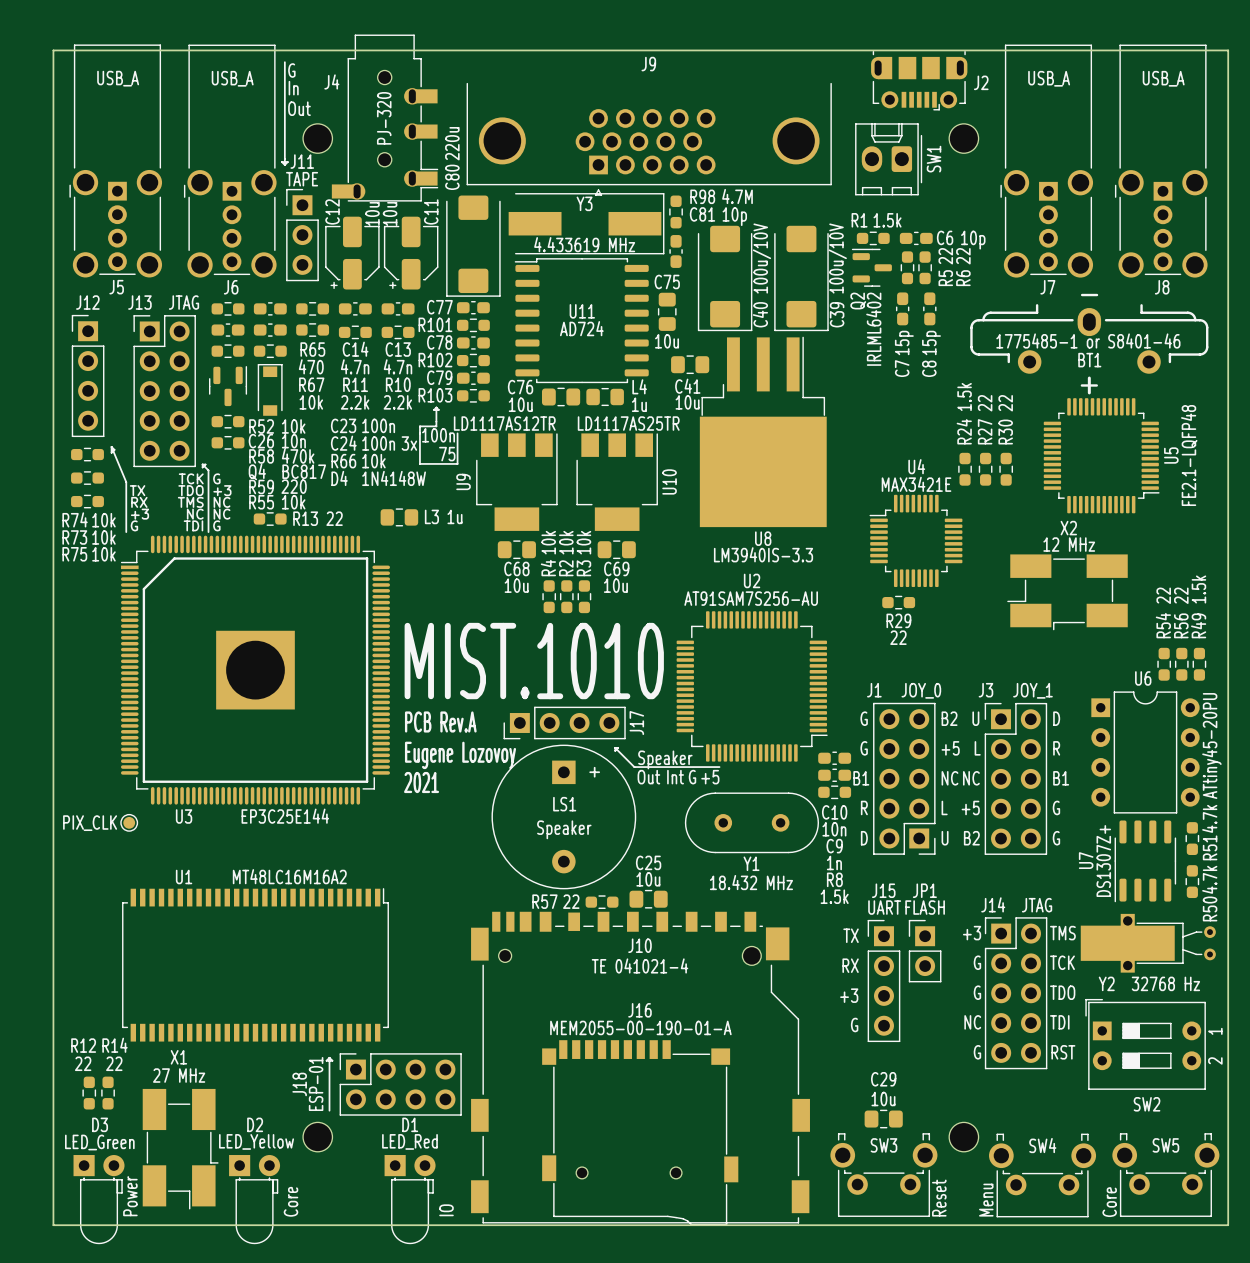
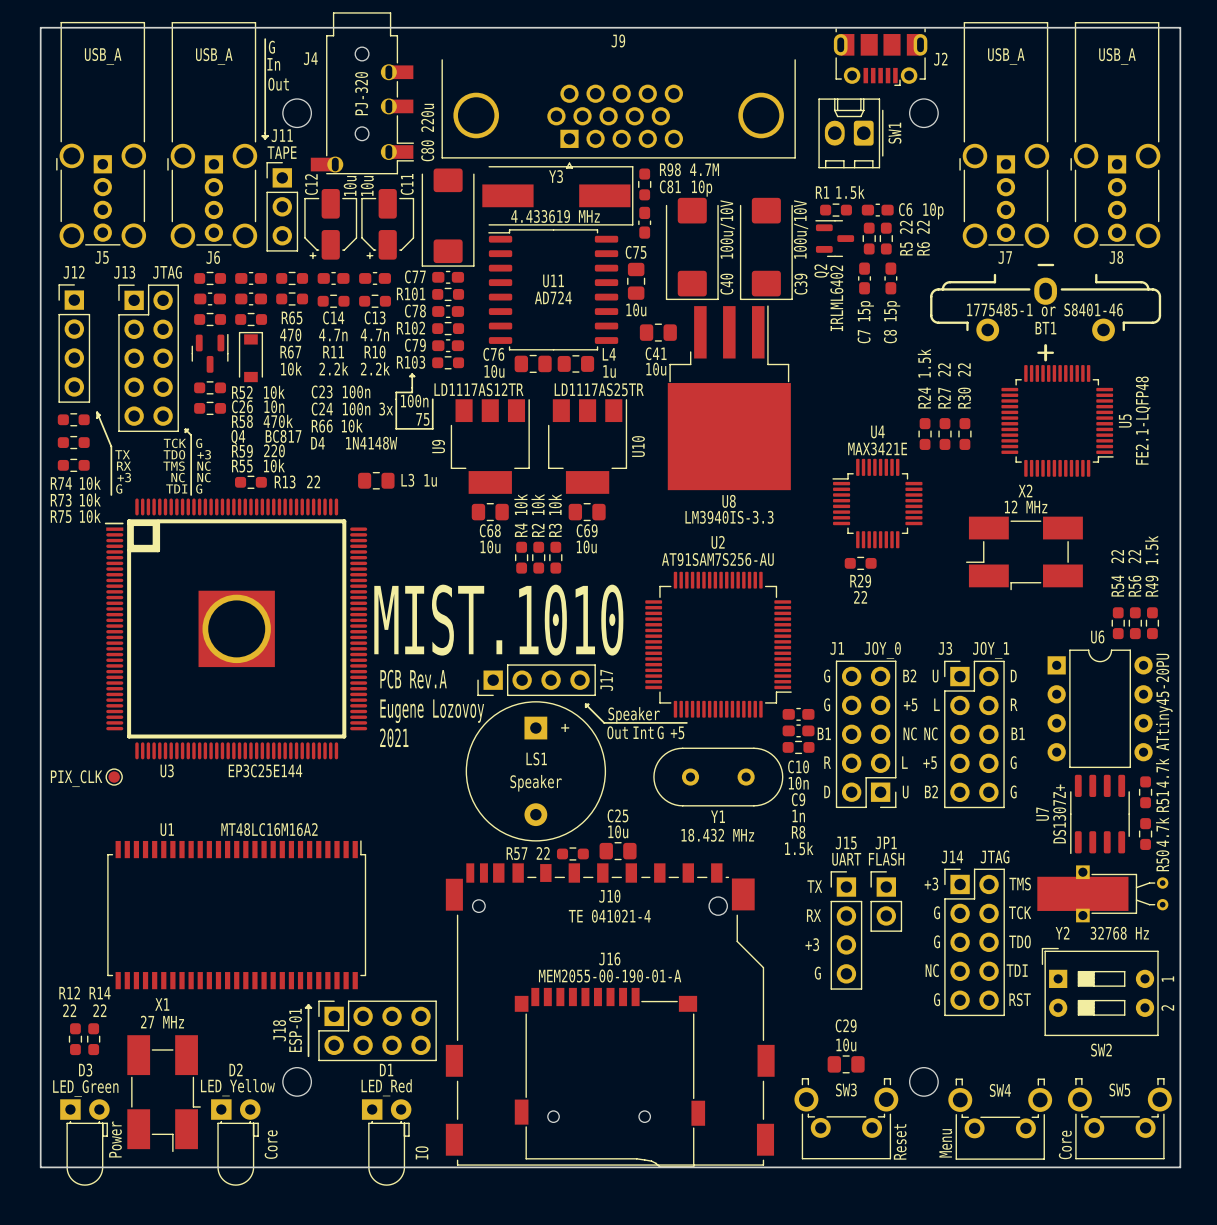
U3 footprint: [120, 535, 391, 805] -> [104, 498, 368, 760]

